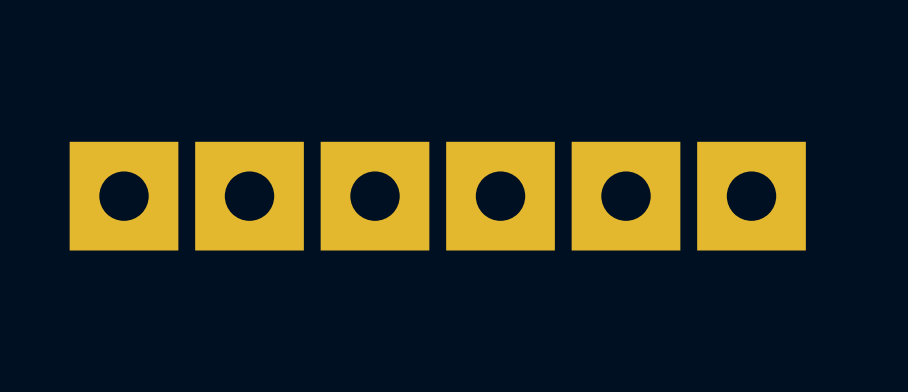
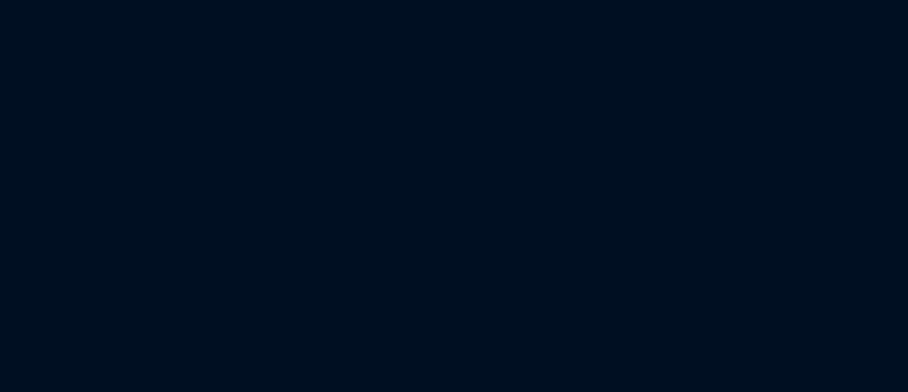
part: (437, 196) -> none

